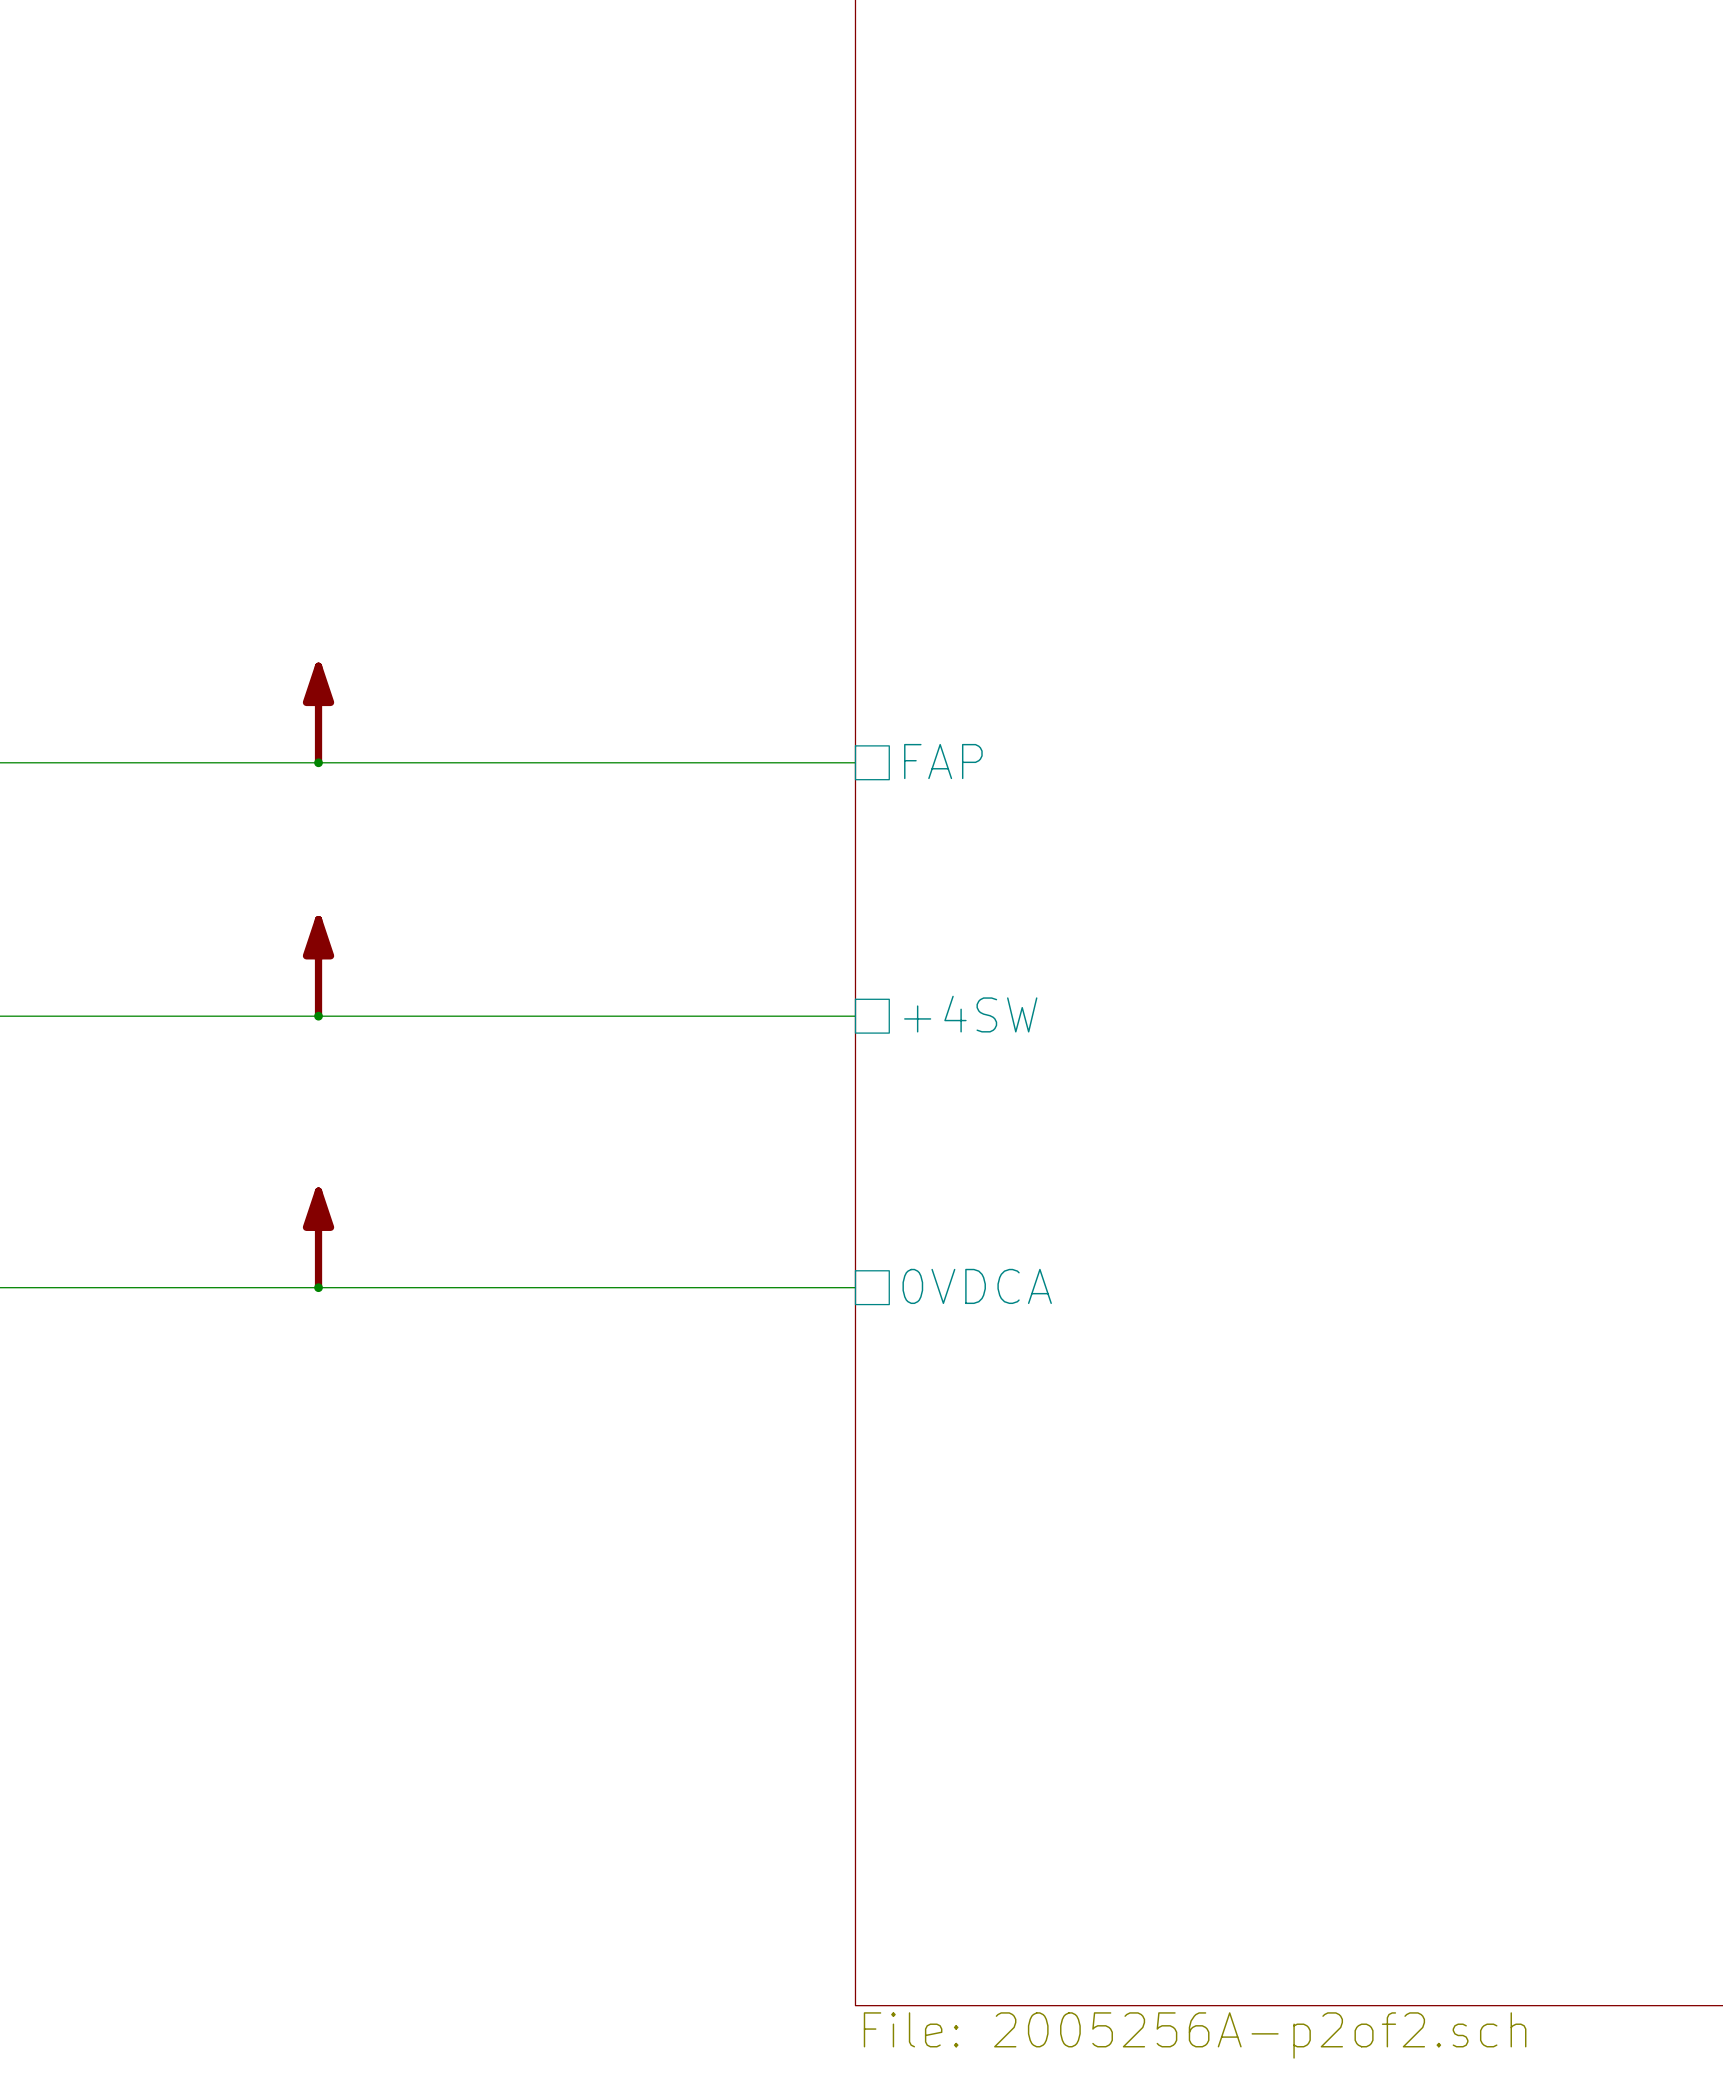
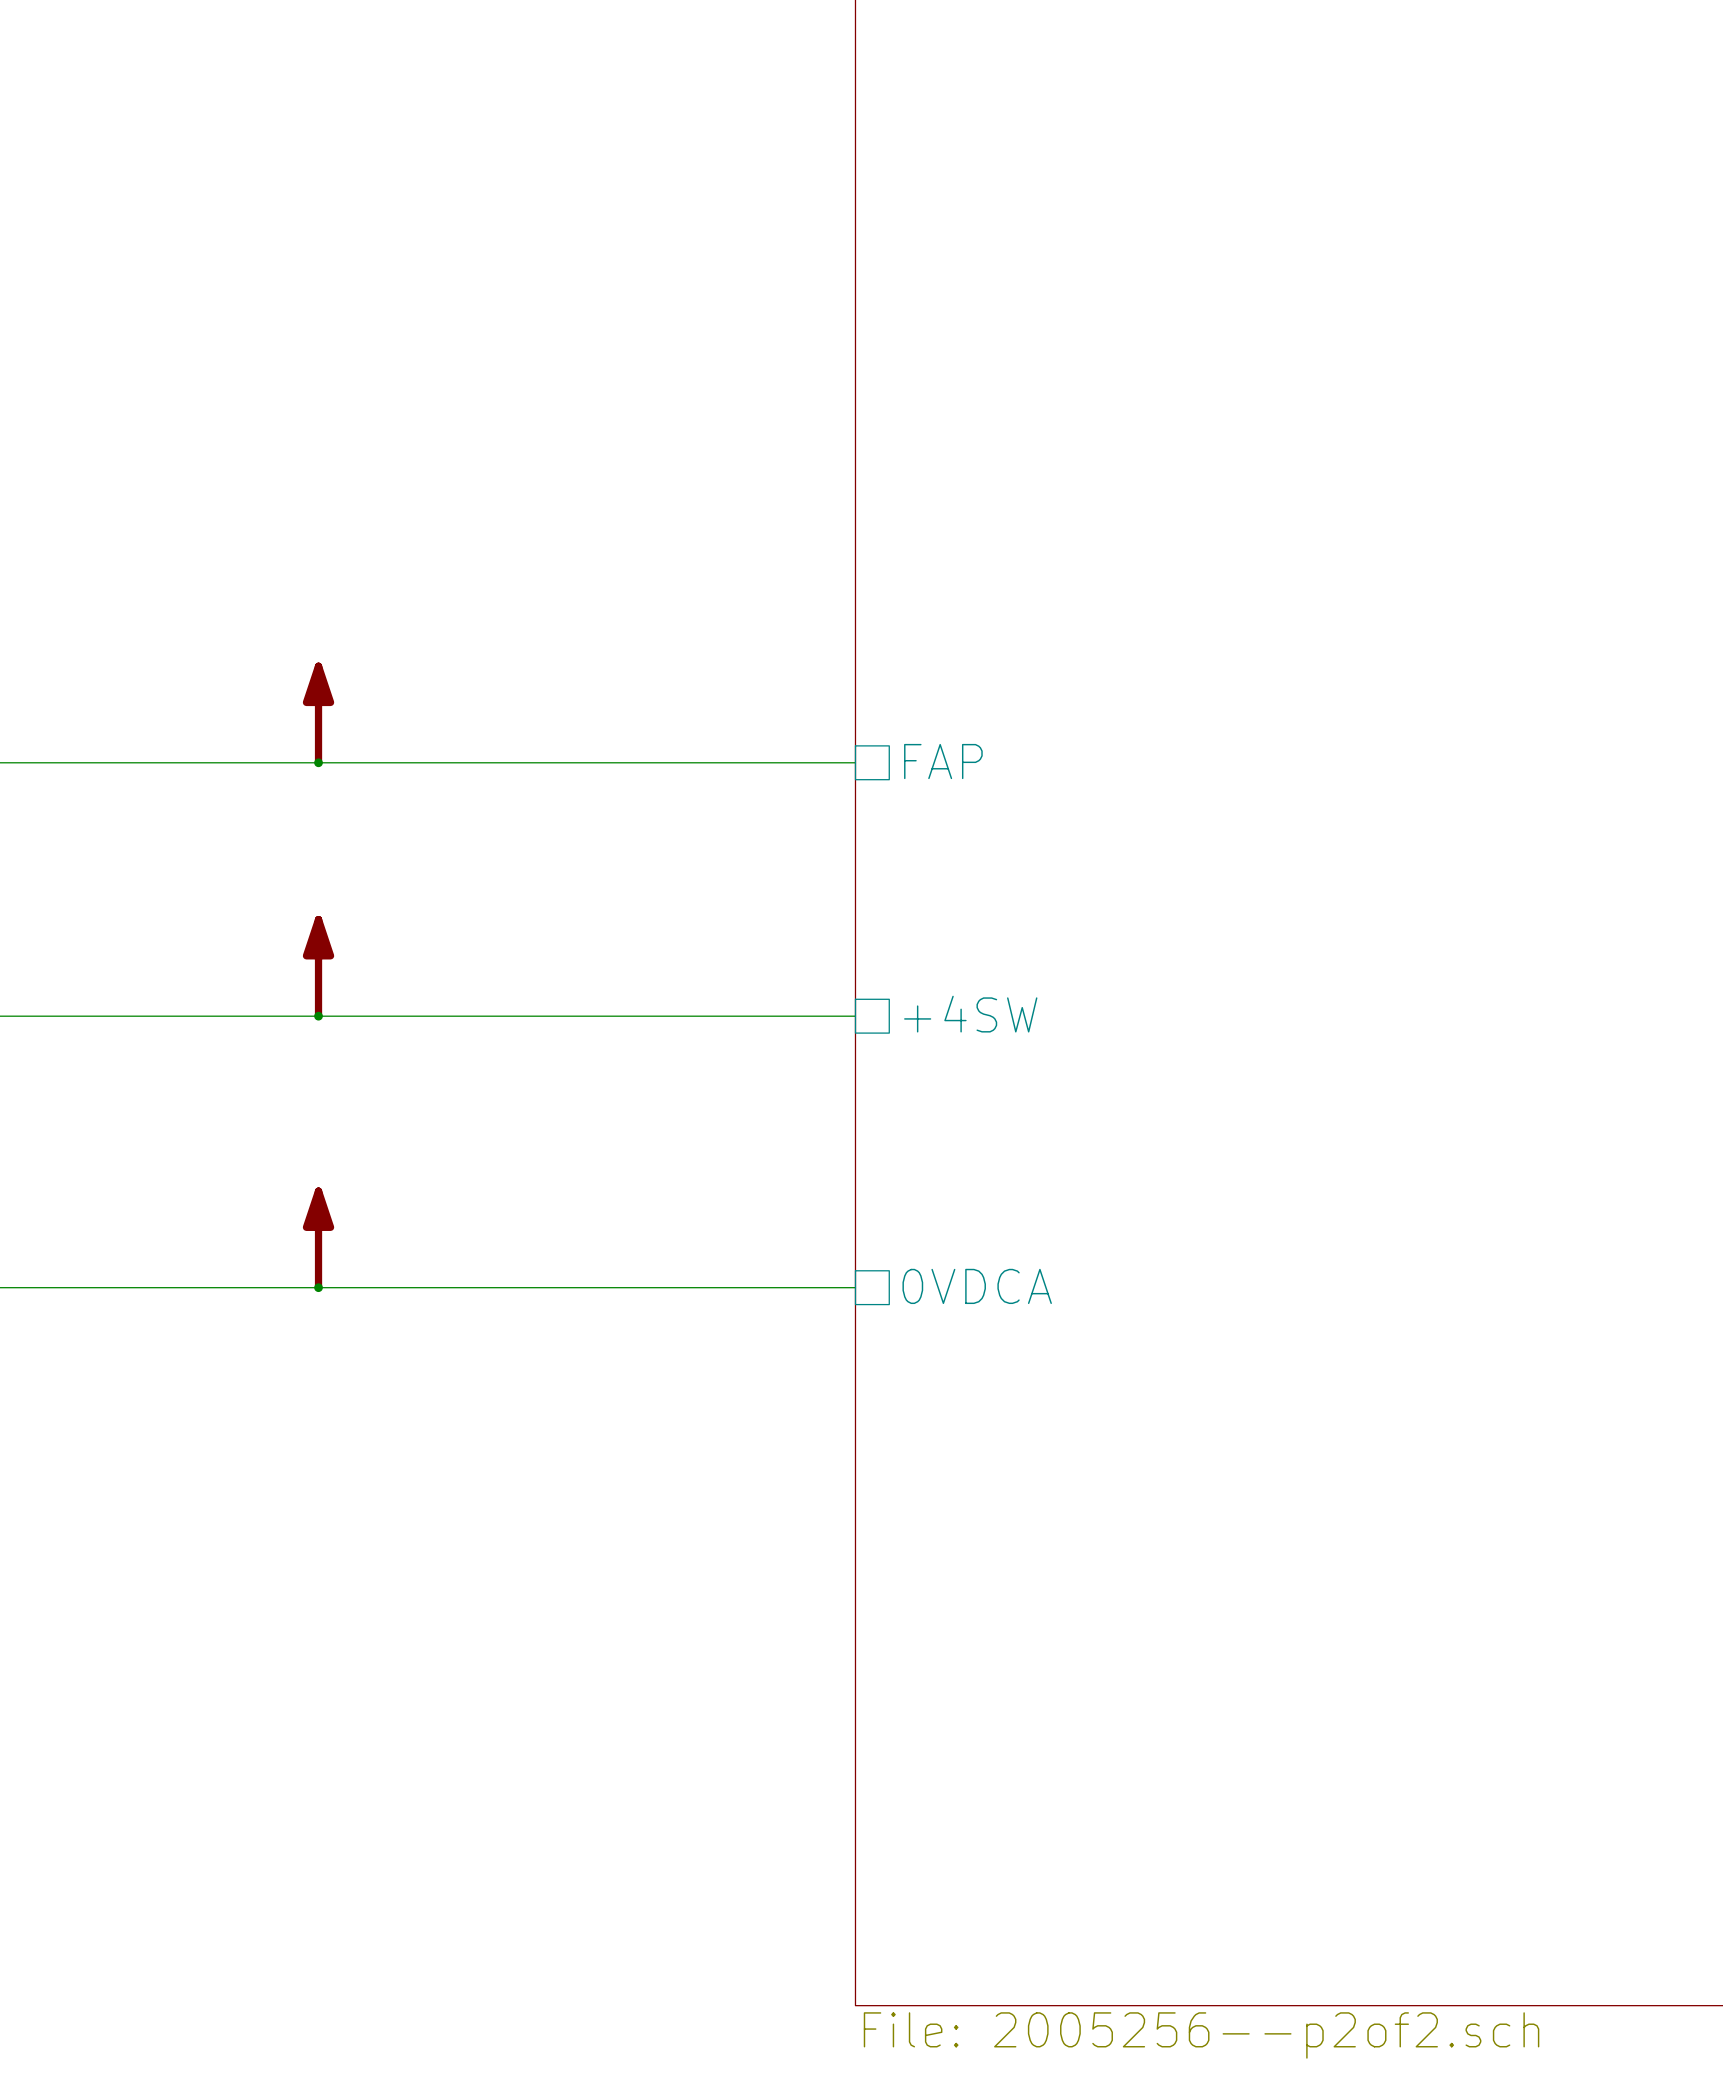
sheet value: File: 2005256A-p2of2.sch (1195, 2035) -> File: 2005256--p2of2.sch (1201, 2035)

